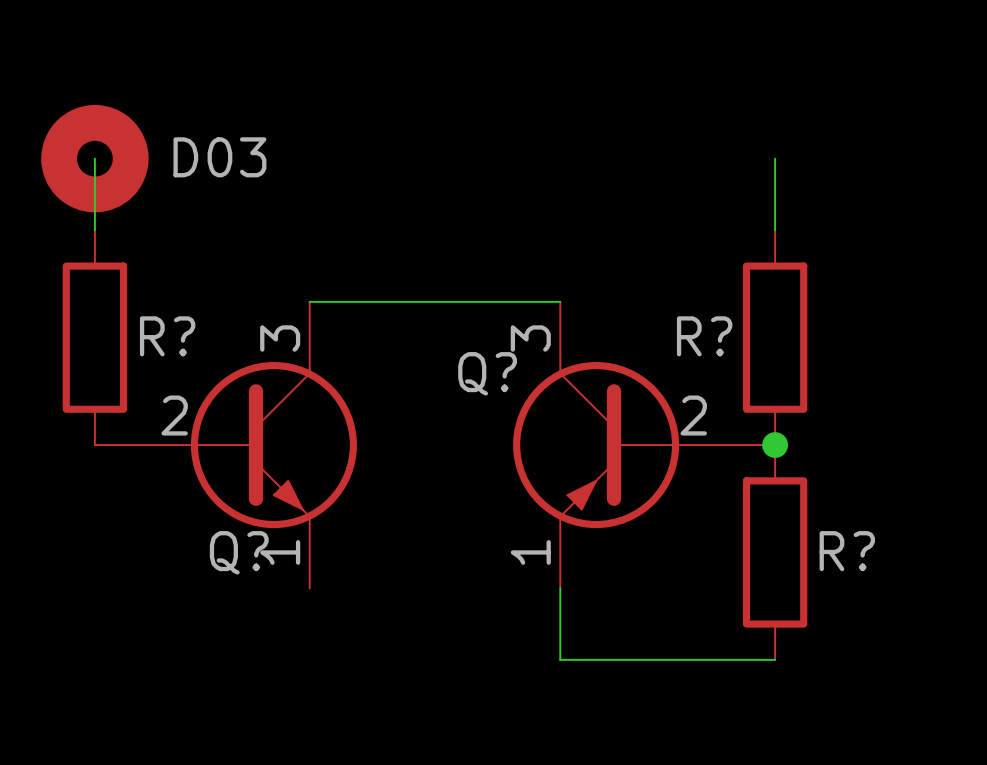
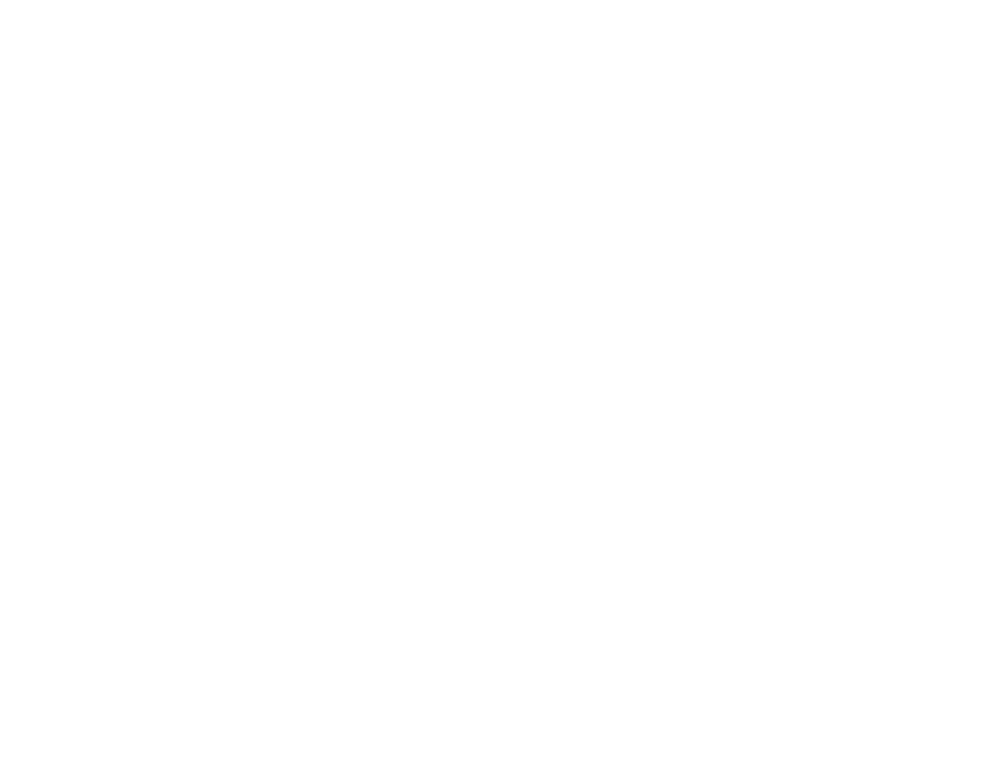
wire: (94, 158) (94, 230) -> none
part: D03 (94, 158) -> none
wire: (775, 158) (775, 230) -> none
wire: (309, 301) (560, 301) -> none
R?: (94, 337) -> none
R?: (775, 337) -> none
Q?: (225, 445) -> none
Q?: (644, 445) -> none
junction: (775, 445) -> none
R?: (775, 552) -> none
wire: (560, 588) (560, 659) (775, 659) -> none

